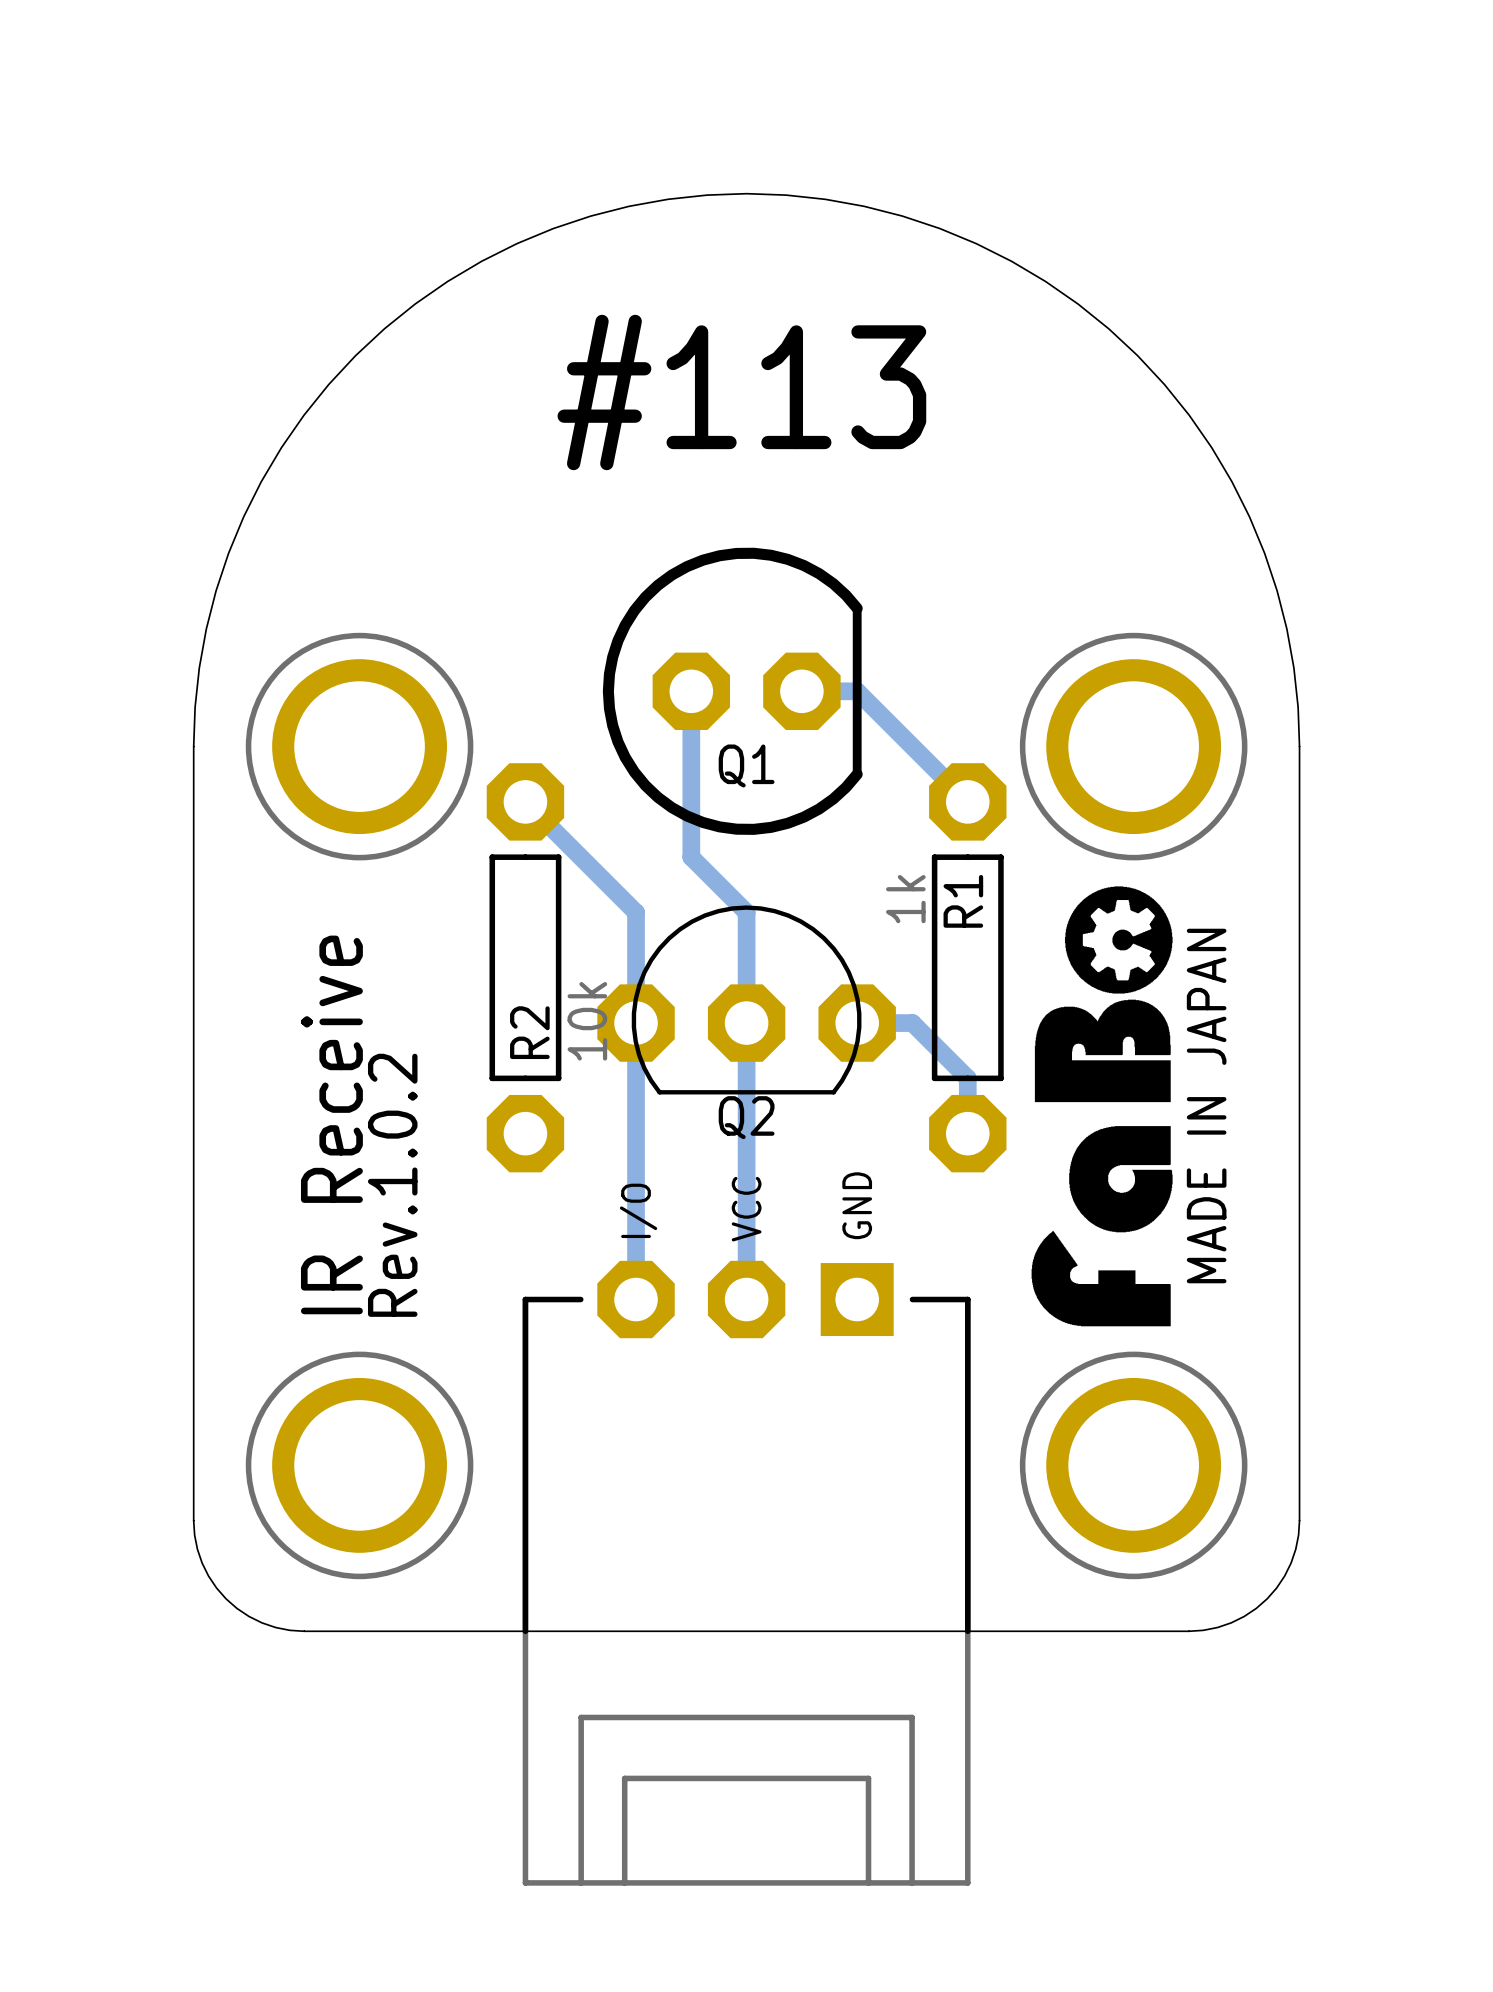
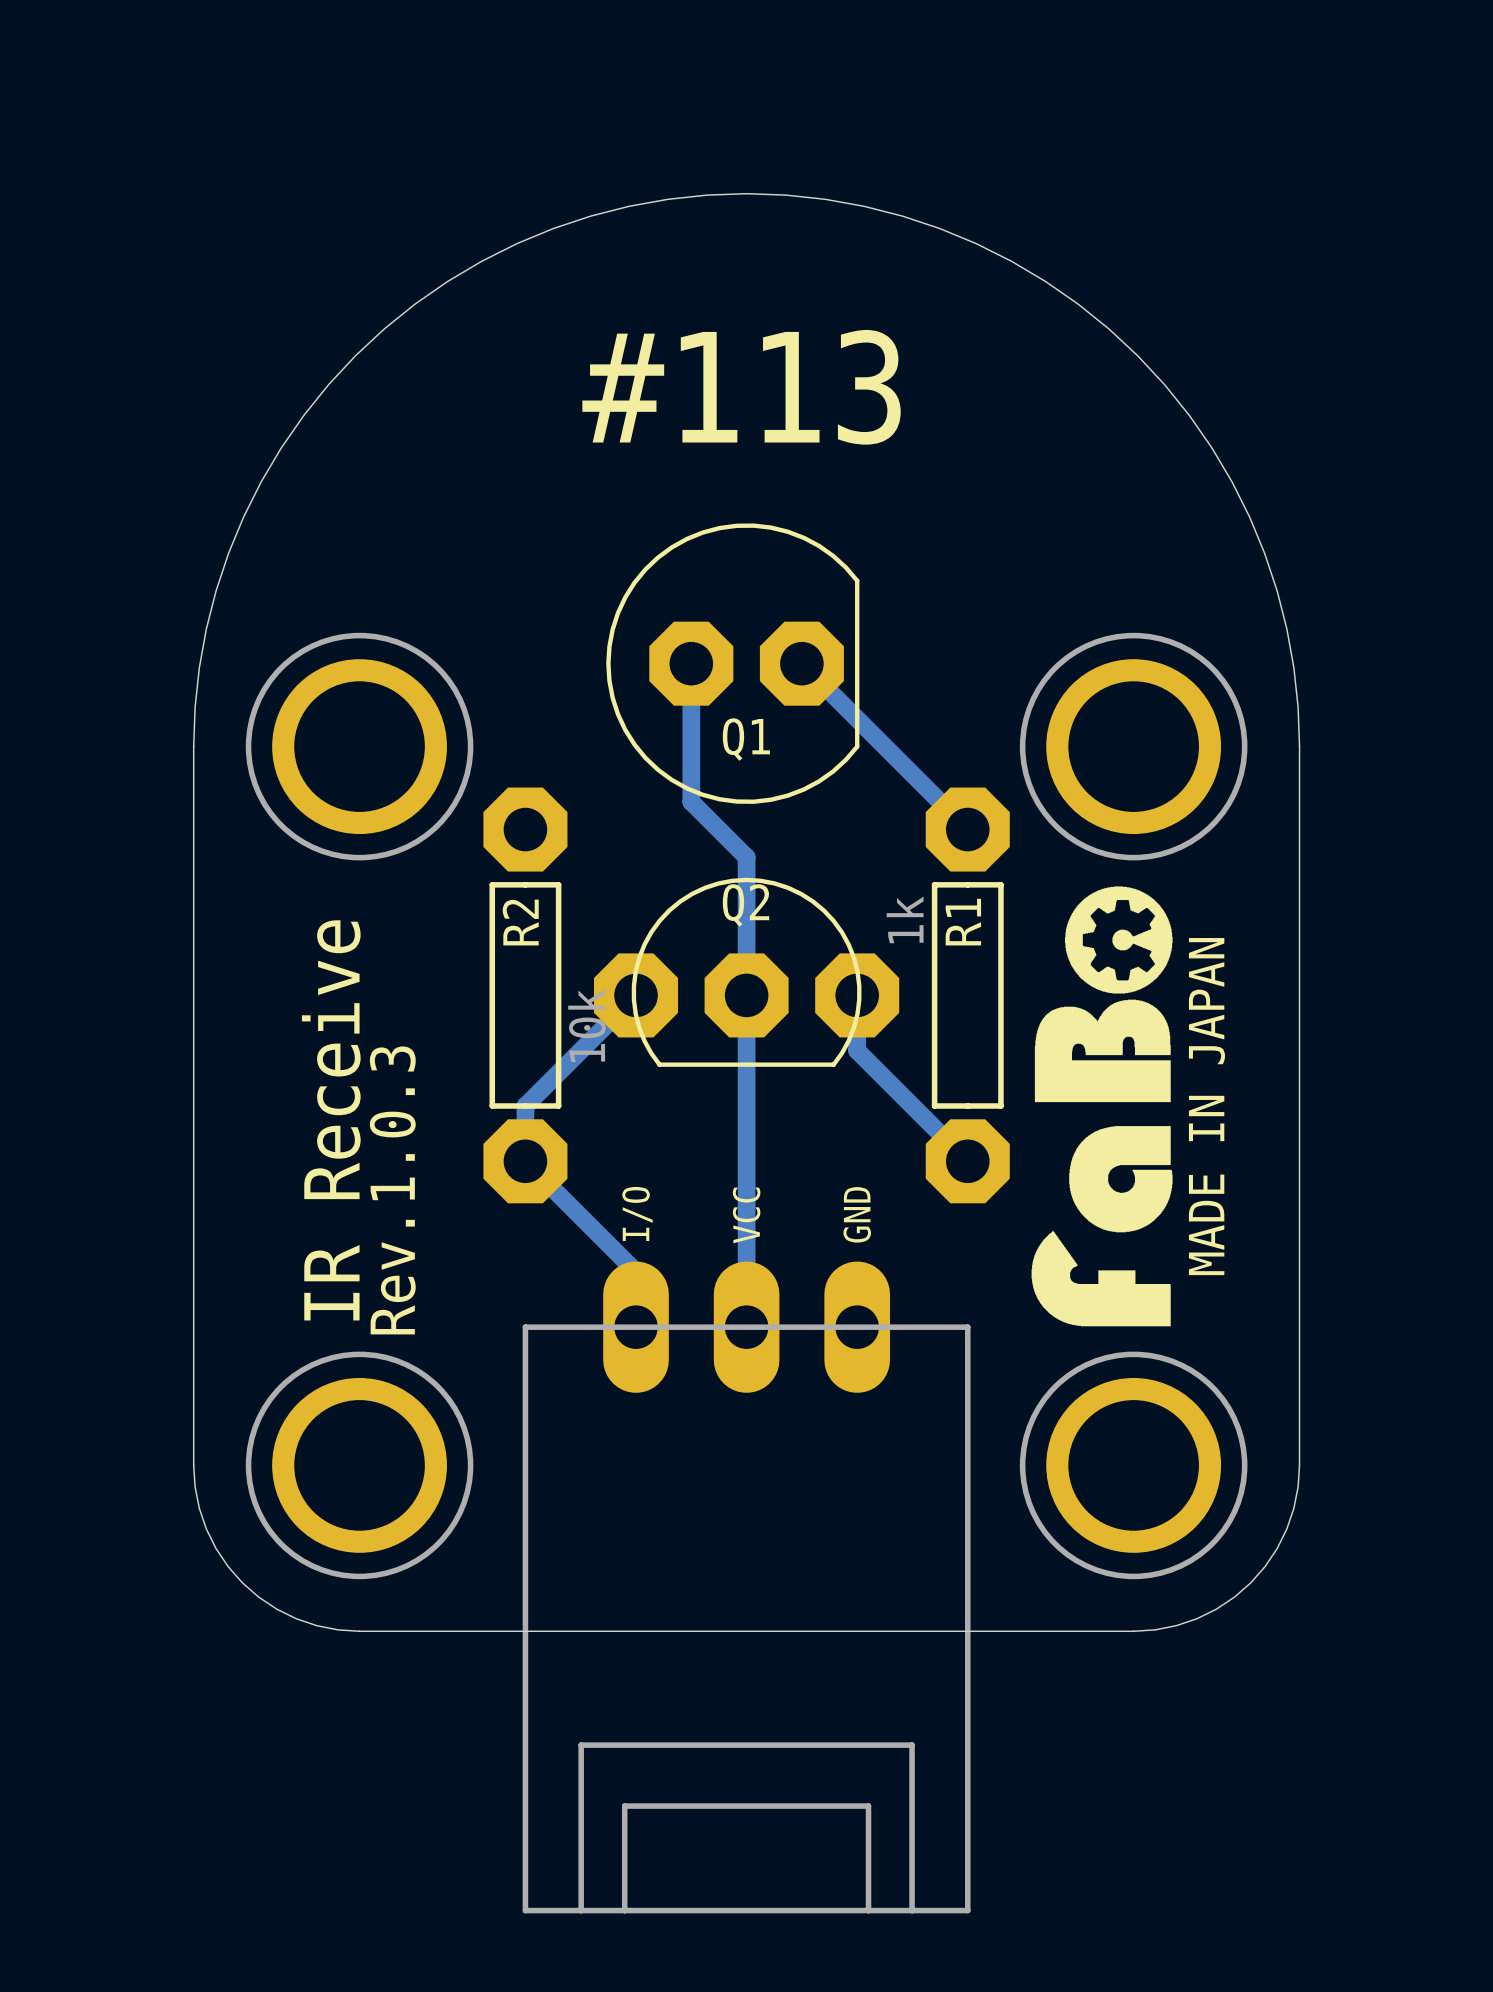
part footprint: [193, 193, 1300, 1886] -> [193, 193, 1300, 1914]
Q1 footprint: [602, 547, 863, 835] -> [606, 523, 860, 804]
bottom track: none -> (801, 663) (967, 829)
bottom track: (801, 691) (857, 691) (967, 801) -> none
R2 footprint: [486, 763, 565, 1173] -> [483, 787, 568, 1204]
R1 footprint: [929, 763, 1007, 1173] -> [925, 787, 1010, 1204]
Q1 name position: Q1 (746, 765) -> Q1 (746, 739)
bottom track: (525, 801) (636, 912) (636, 1271) -> (636, 995) (525, 1106) (525, 1161) (636, 1271)
bottom track: (691, 801) (691, 857) (746, 912) -> (691, 801) (746, 857) (746, 912)
R1 value position: 1k (905, 899) -> 1k (905, 919)
R1 name position: R1 (963, 901) -> R1 (963, 922)
Q2 footprint: [597, 905, 896, 1095] -> [594, 877, 900, 1067]
bottom track: none -> (857, 995) (857, 1050) (967, 1161)
bottom track: (857, 1023) (912, 1023) (967, 1078) (967, 1133) -> none
R2 name position: R2 (529, 1032) -> R2 (520, 922)
Q2 name position: Q2 (746, 1117) -> Q2 (746, 905)
text: Rev.1.0.2 (392, 1185) -> Rev.1.0.3 (392, 1190)

